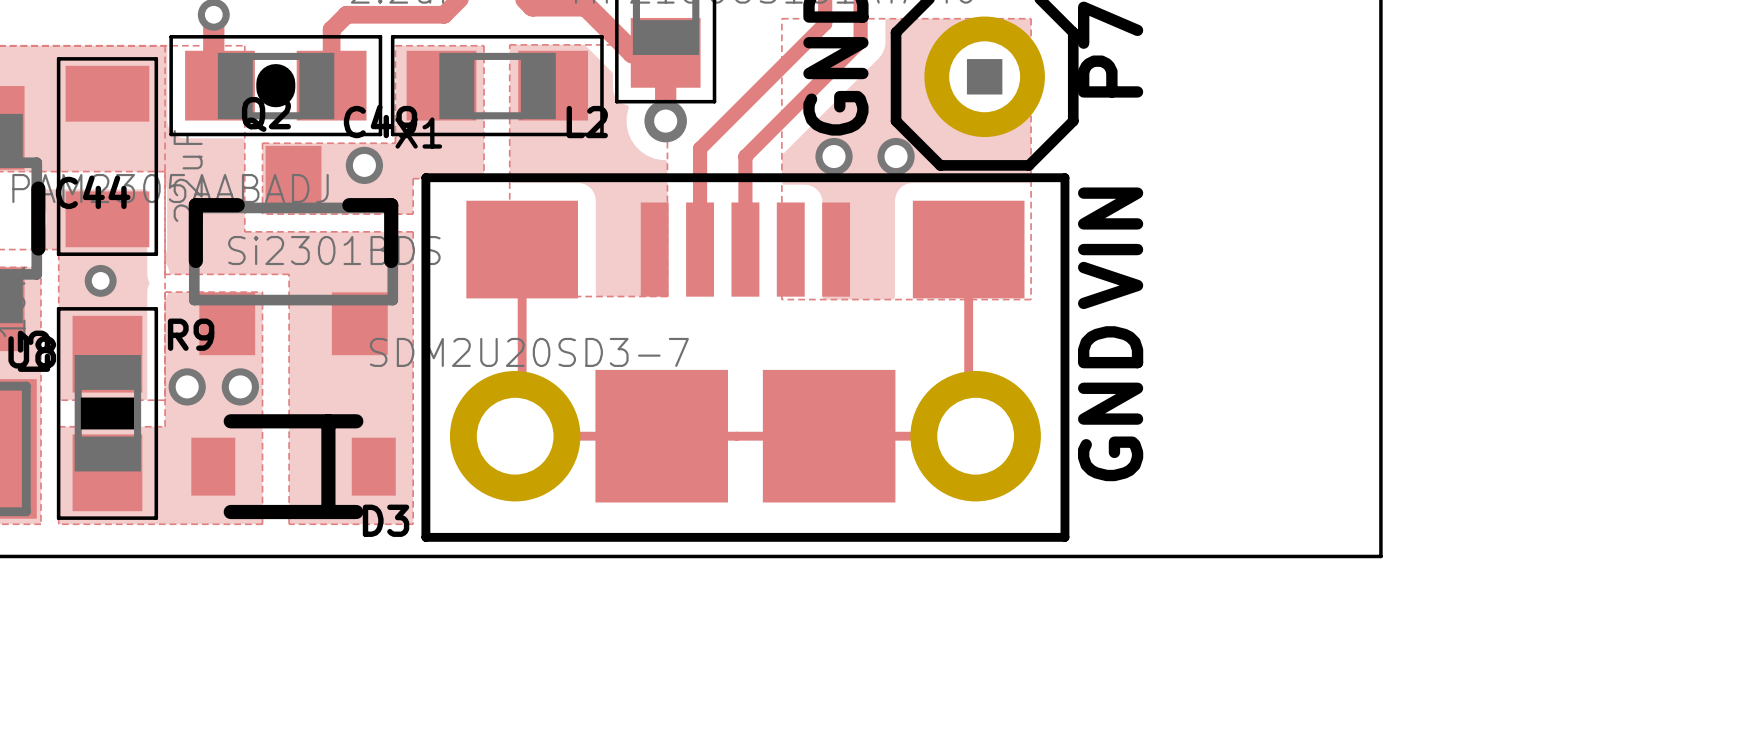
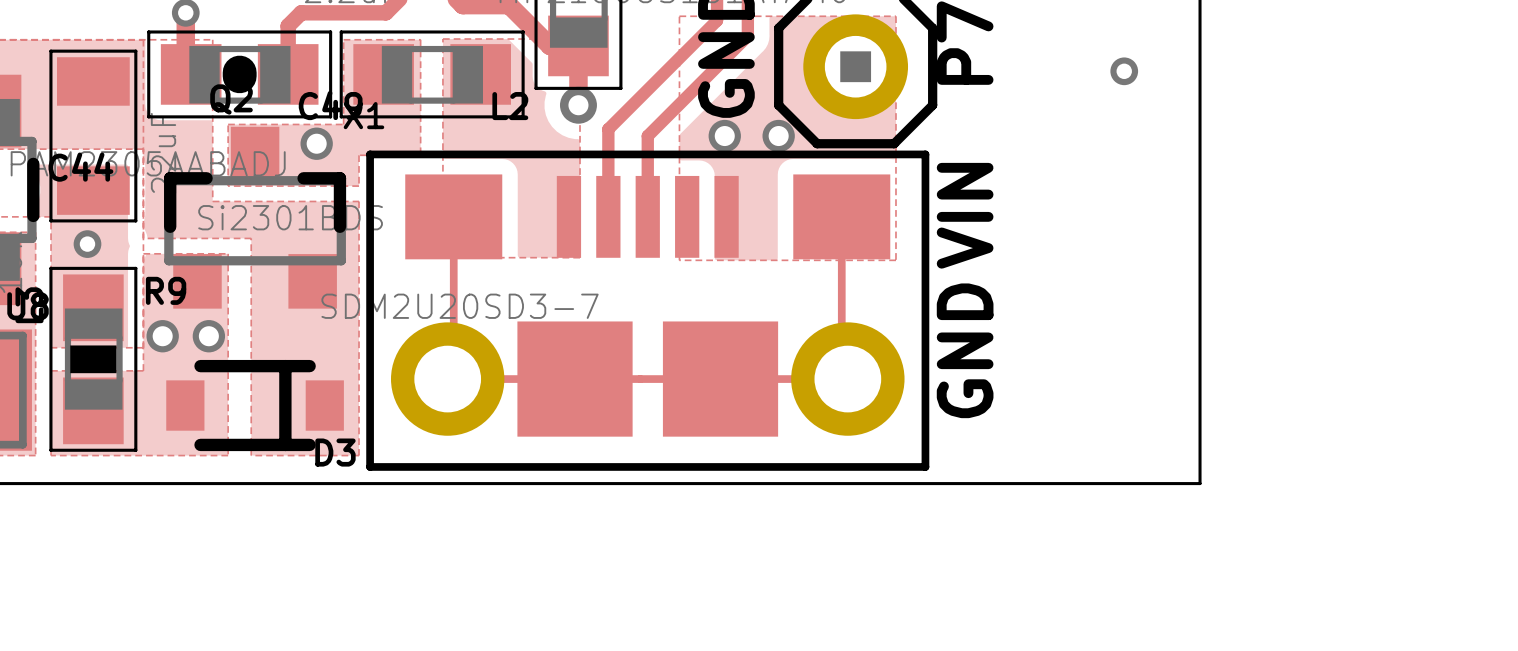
via: none -> (1124, 71)

